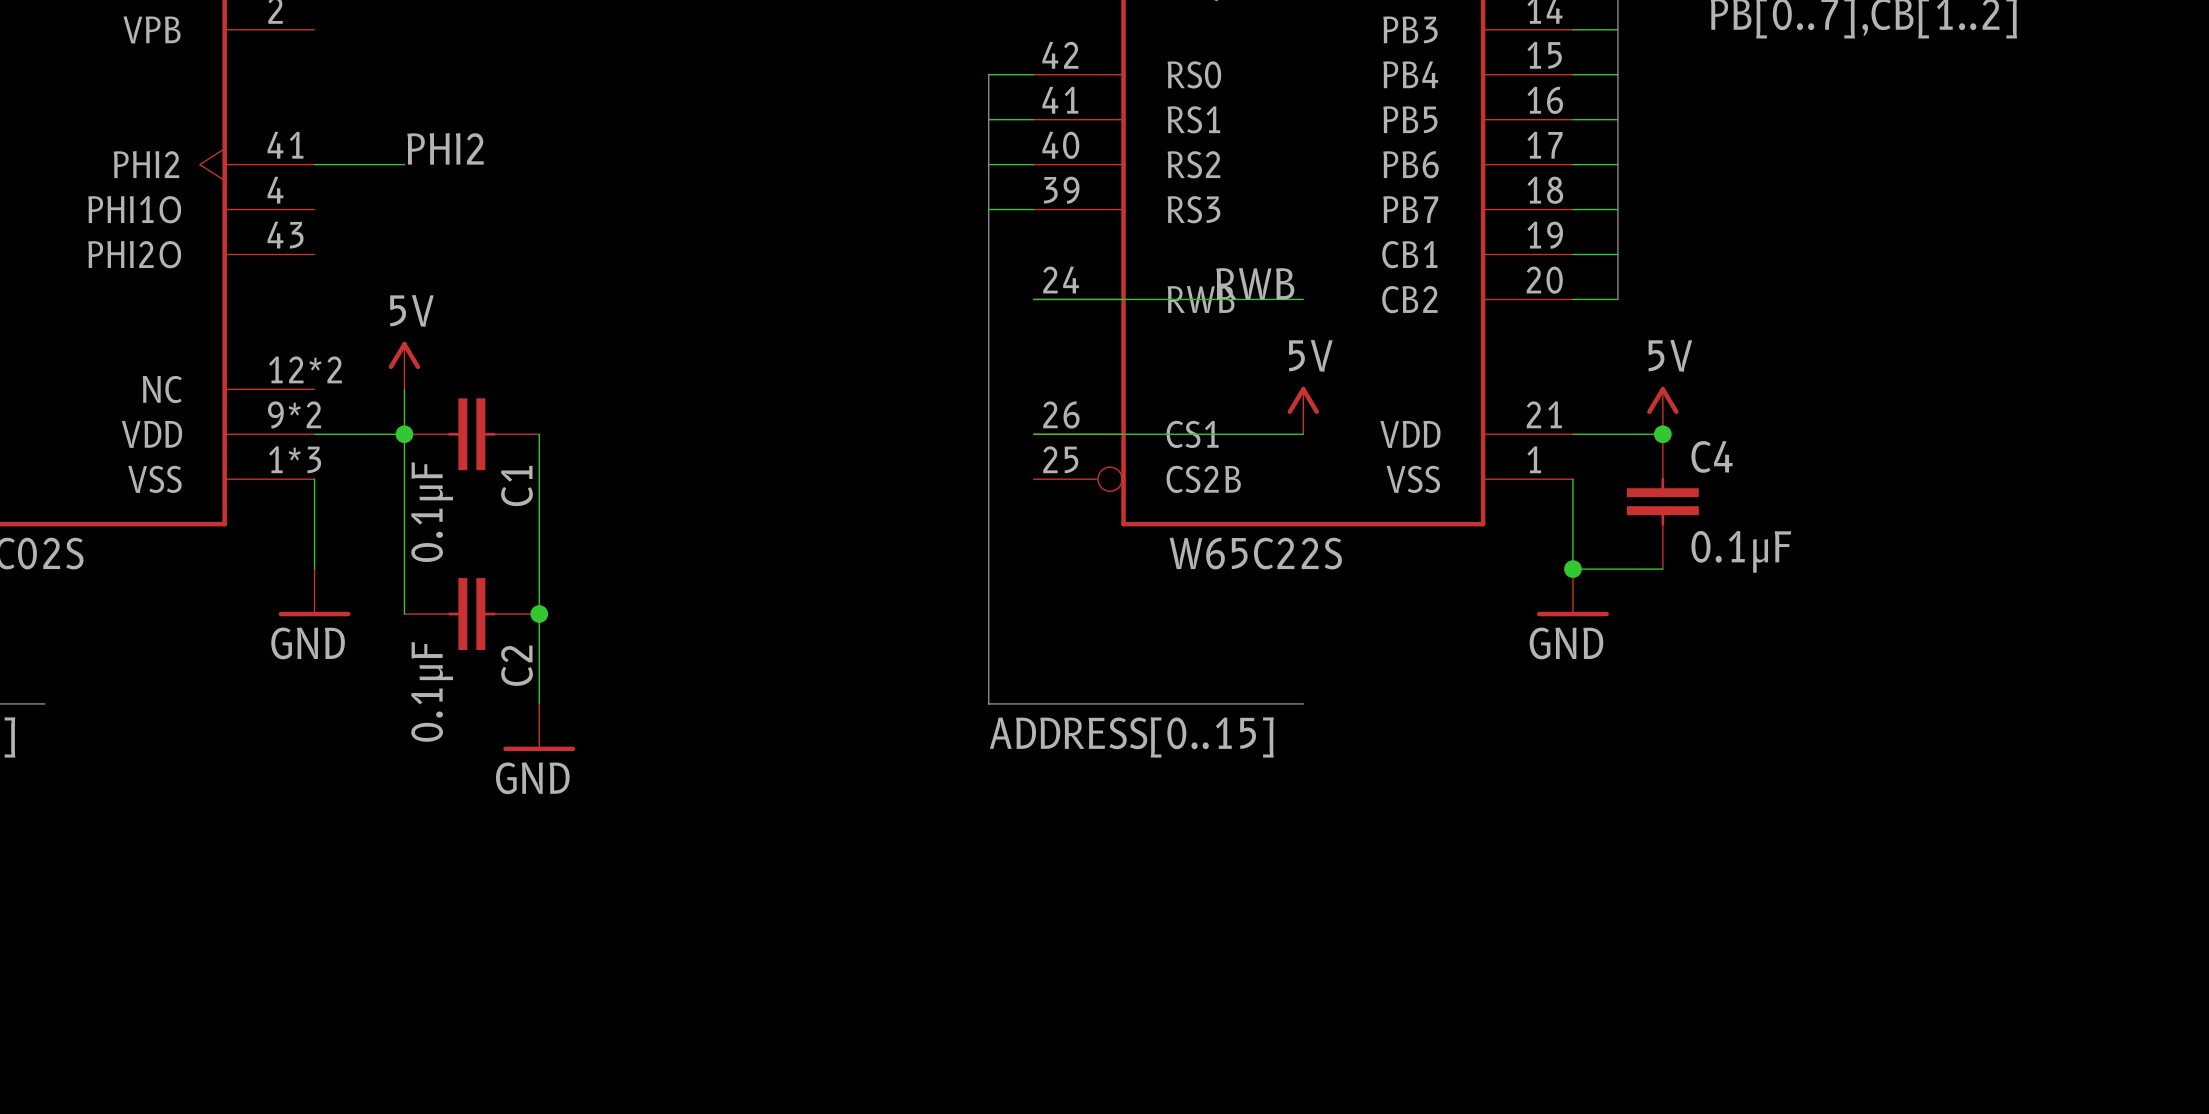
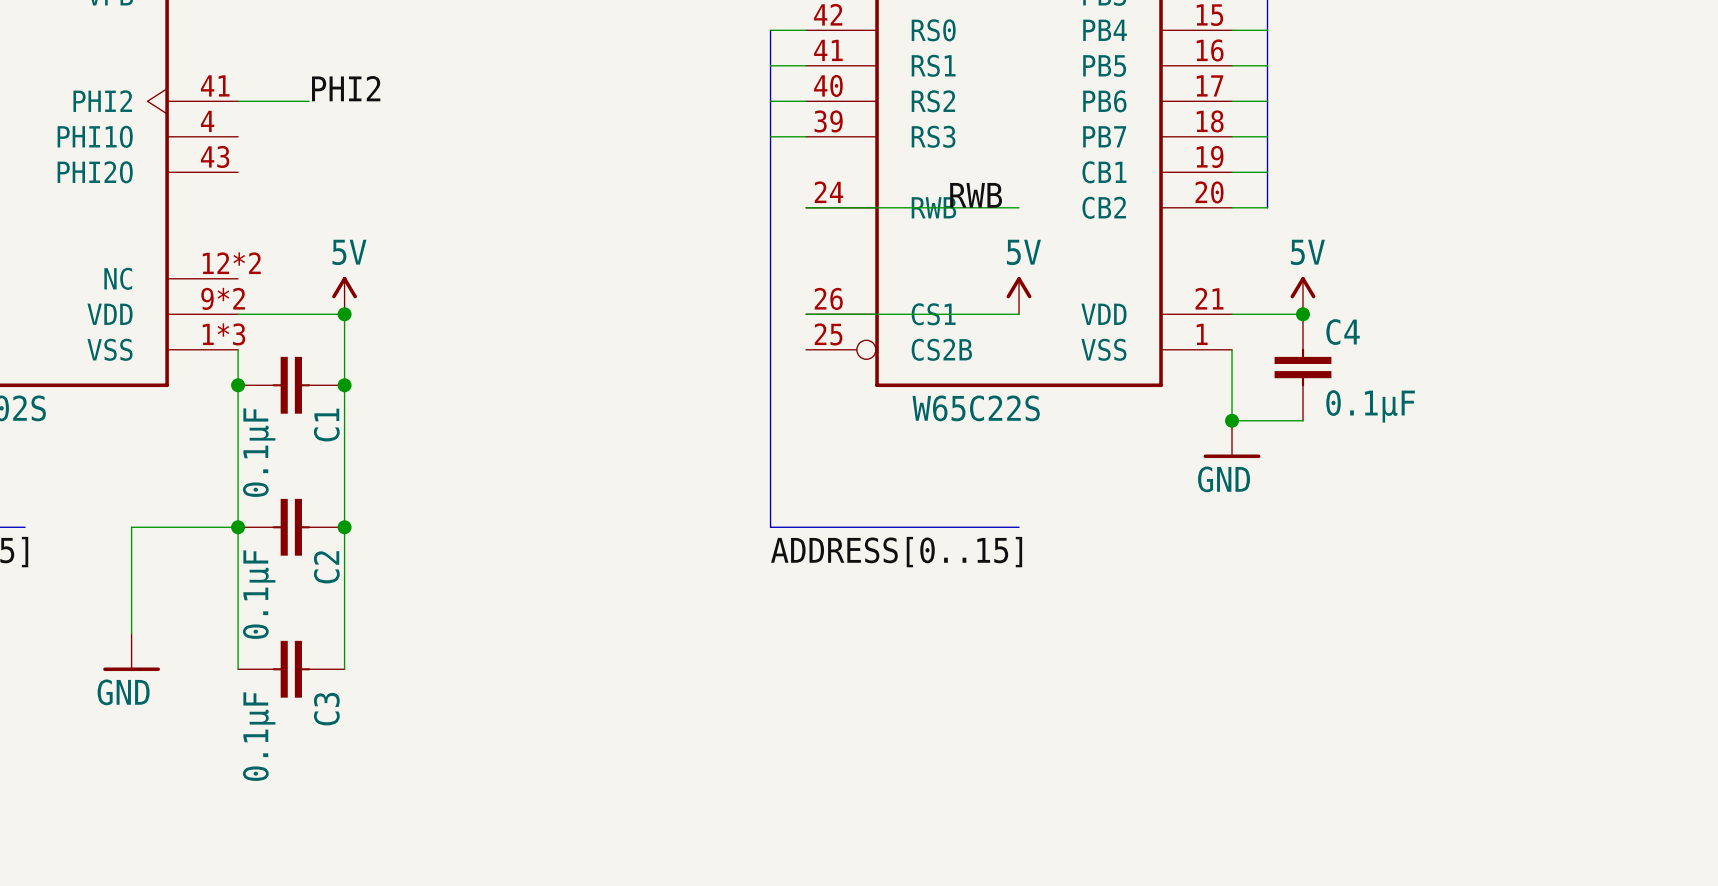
power symbol position: 5V (404, 365) -> 5V (344, 295)
wire: (404, 389) (404, 614) -> none
wire: none -> (309, 314) (344, 314) (344, 669)
junction position: (404, 434) -> (344, 314)
C1 position: (471, 434) -> (291, 385)
wire: (539, 434) (539, 703) -> none
junction: none -> (238, 385)
junction: none -> (344, 385)
wire: none -> (238, 420) (238, 669)
power symbol: GND (314, 592) -> none
C2 position: (471, 614) -> (291, 527)
junction: (539, 614) -> none
wire: none -> (238, 527) (131, 527) (131, 633)
junction: none -> (238, 527)
junction: none -> (344, 527)
power symbol: GND (539, 727) -> none
power symbol: none -> GND (131, 652)
C3: none -> 0.1μF (291, 669)

